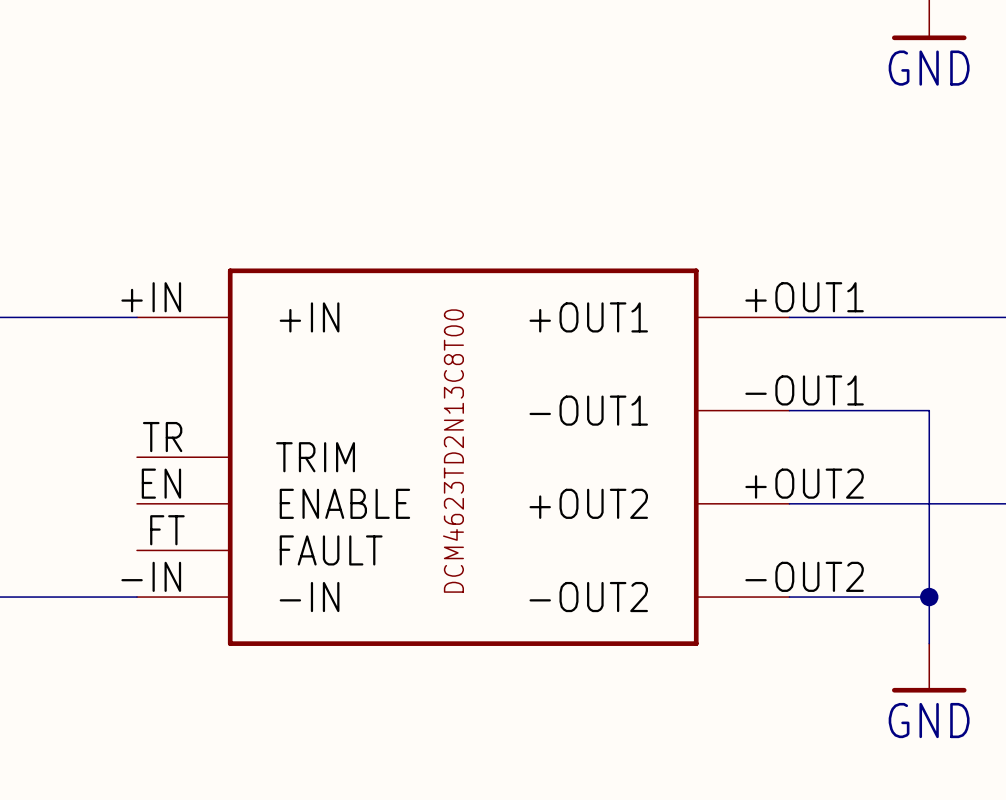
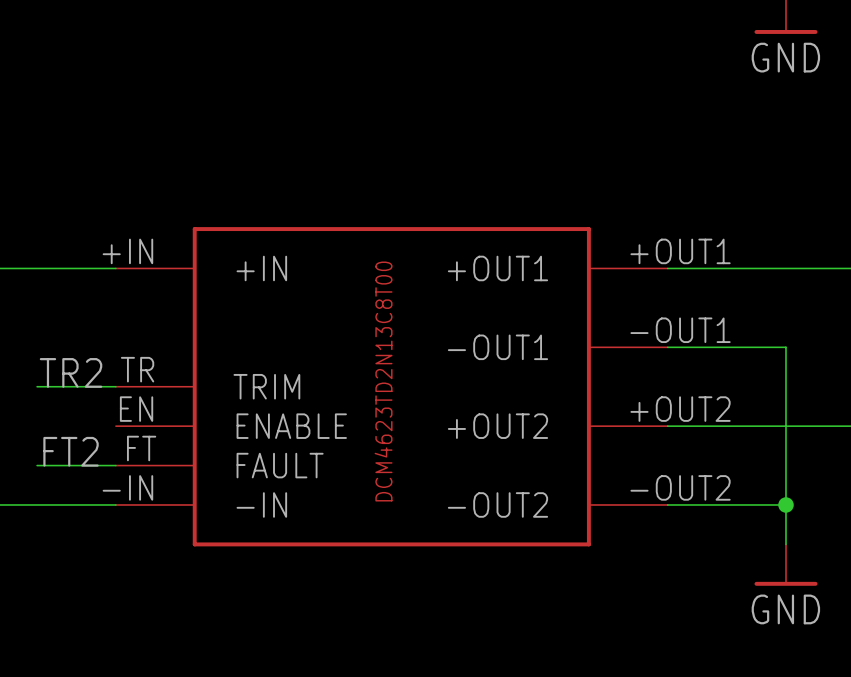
label: none -> TR2 (71, 372)
wire: none -> (37, 386) (115, 386)
label: none -> FT2 (71, 451)
wire: none -> (37, 465) (115, 465)

